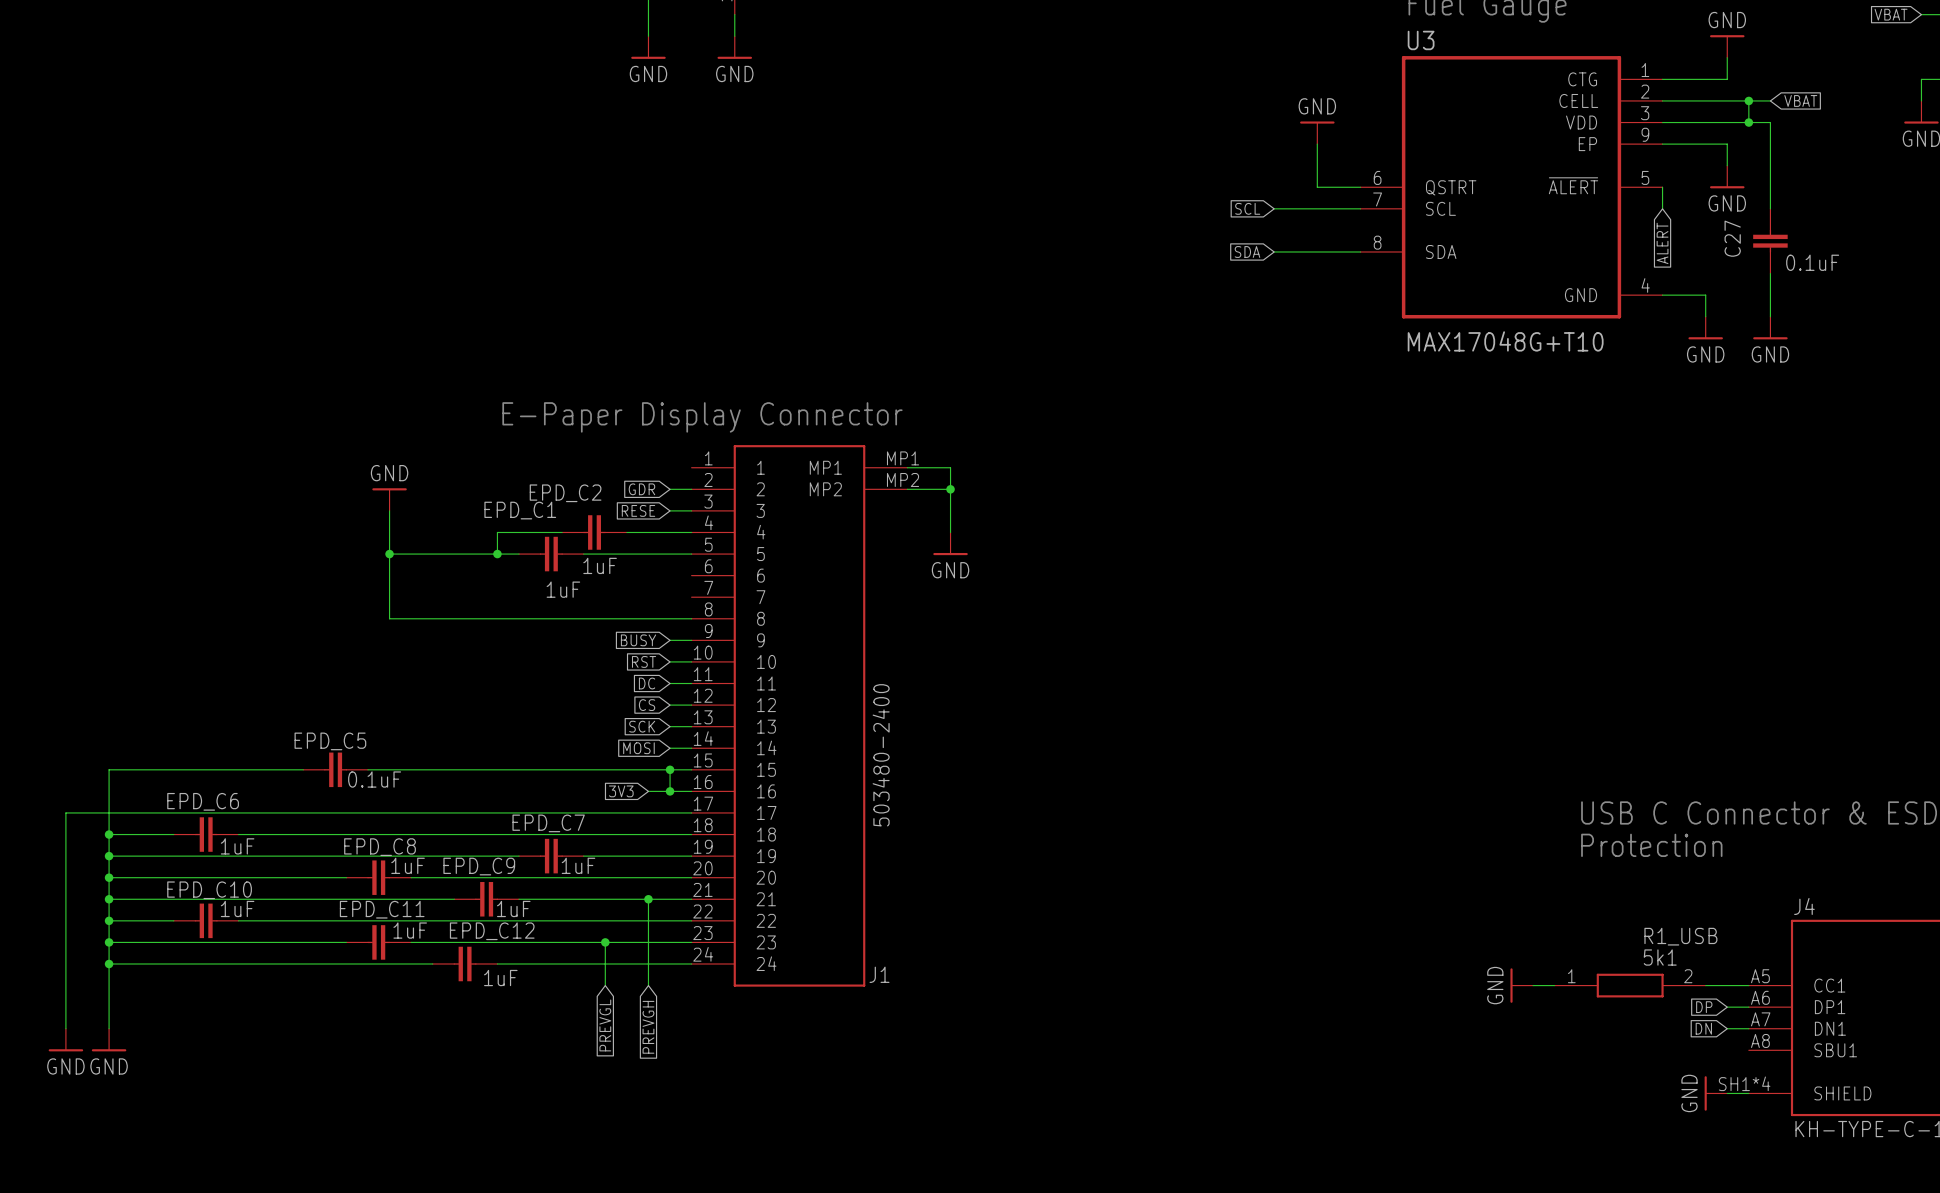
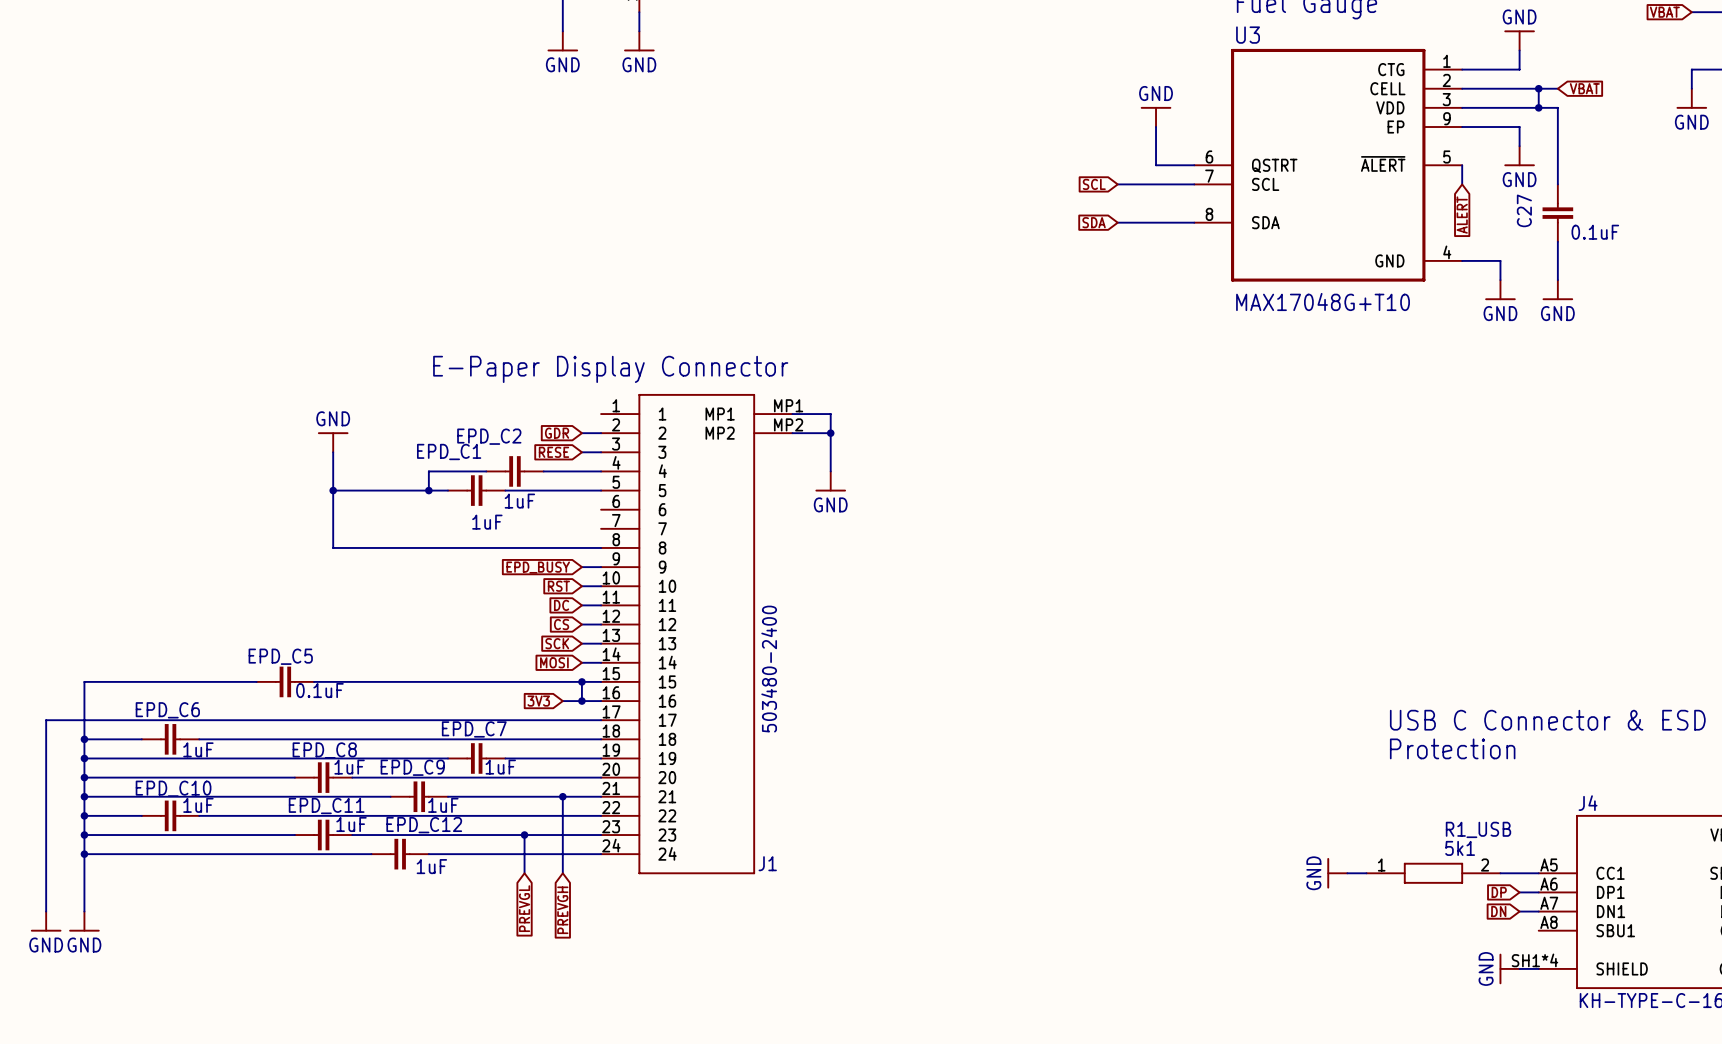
global label: BUSY (638, 640) -> EPD_BUSY (538, 567)

